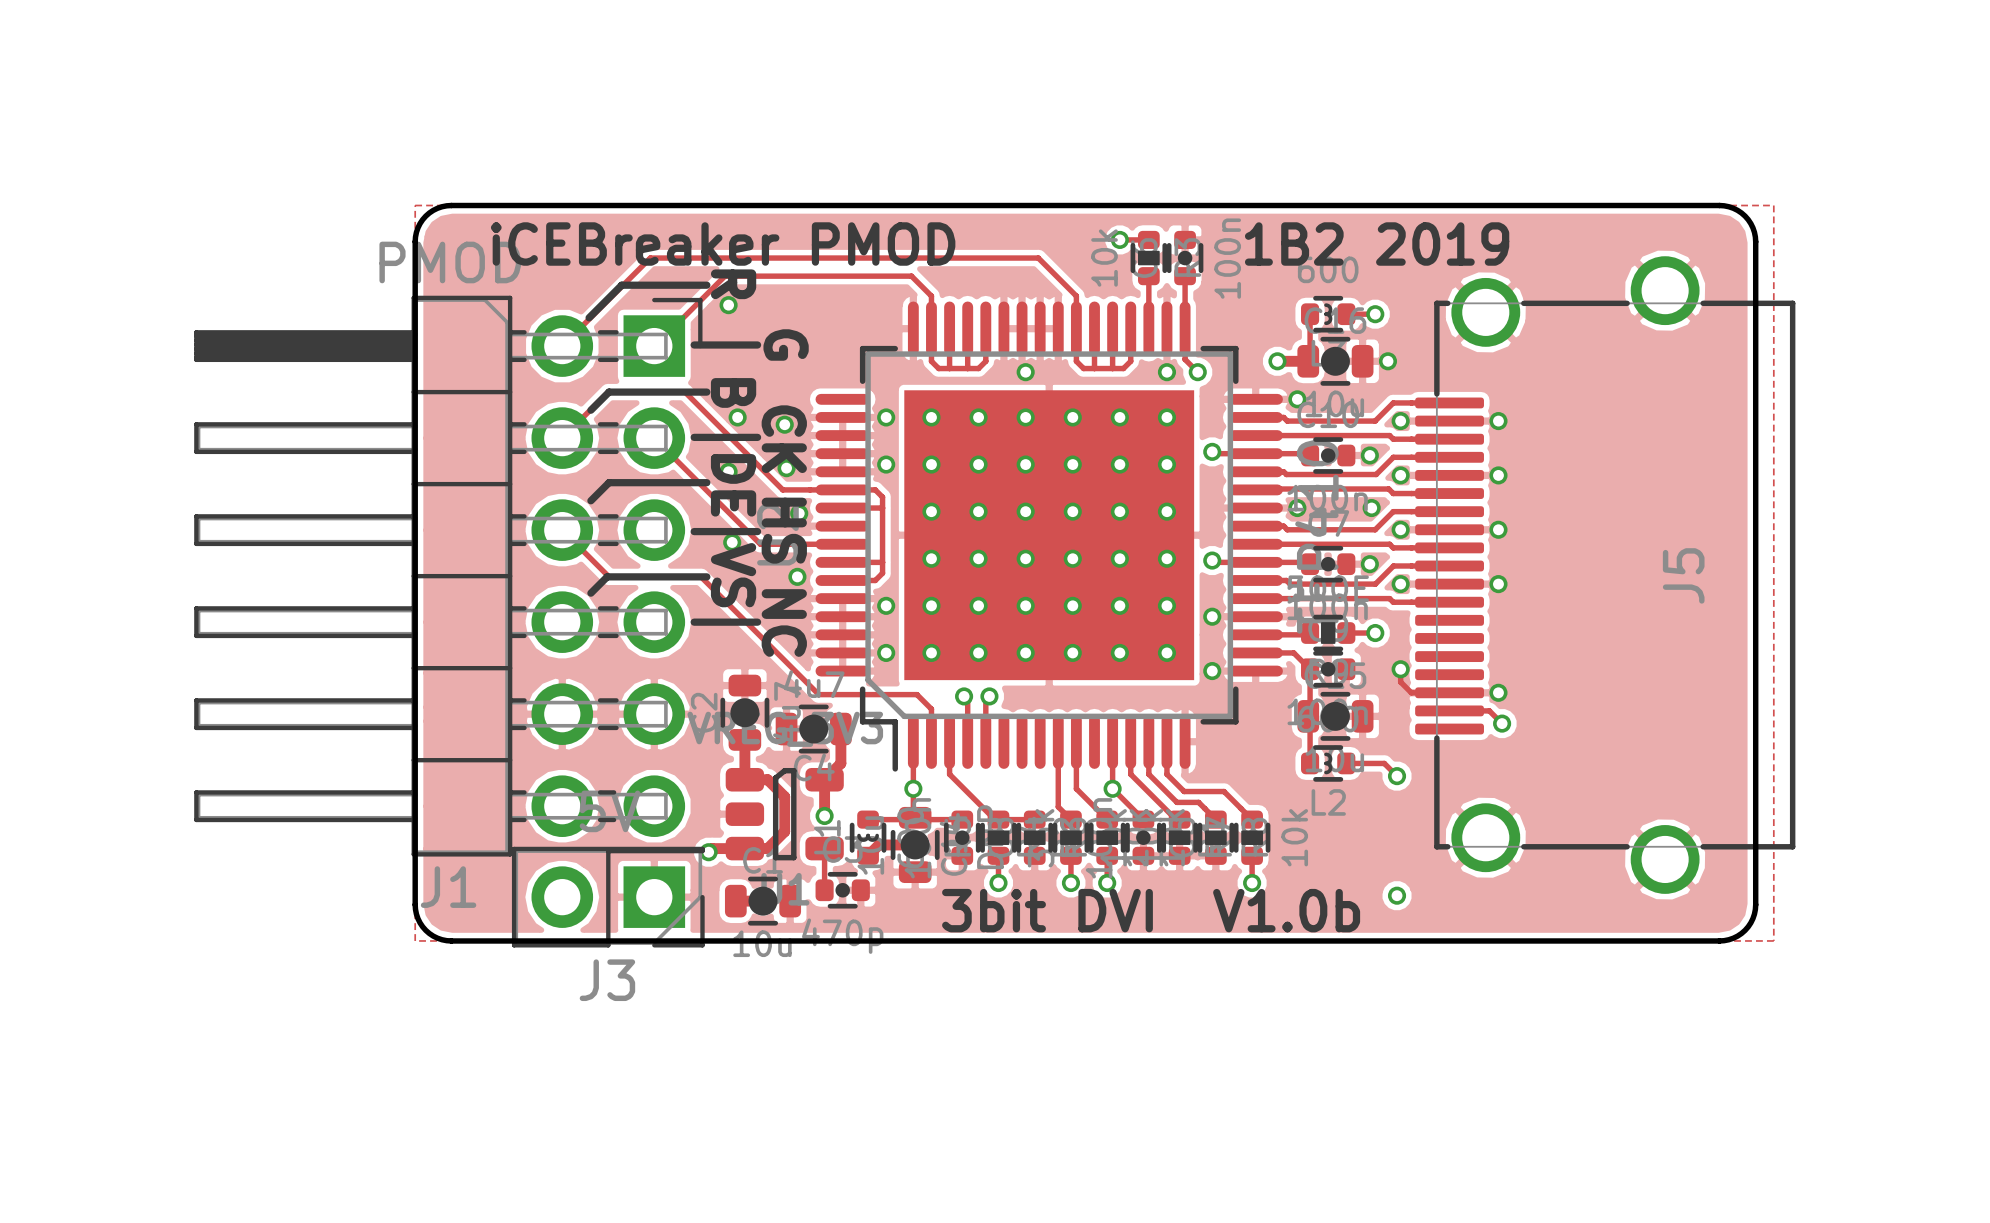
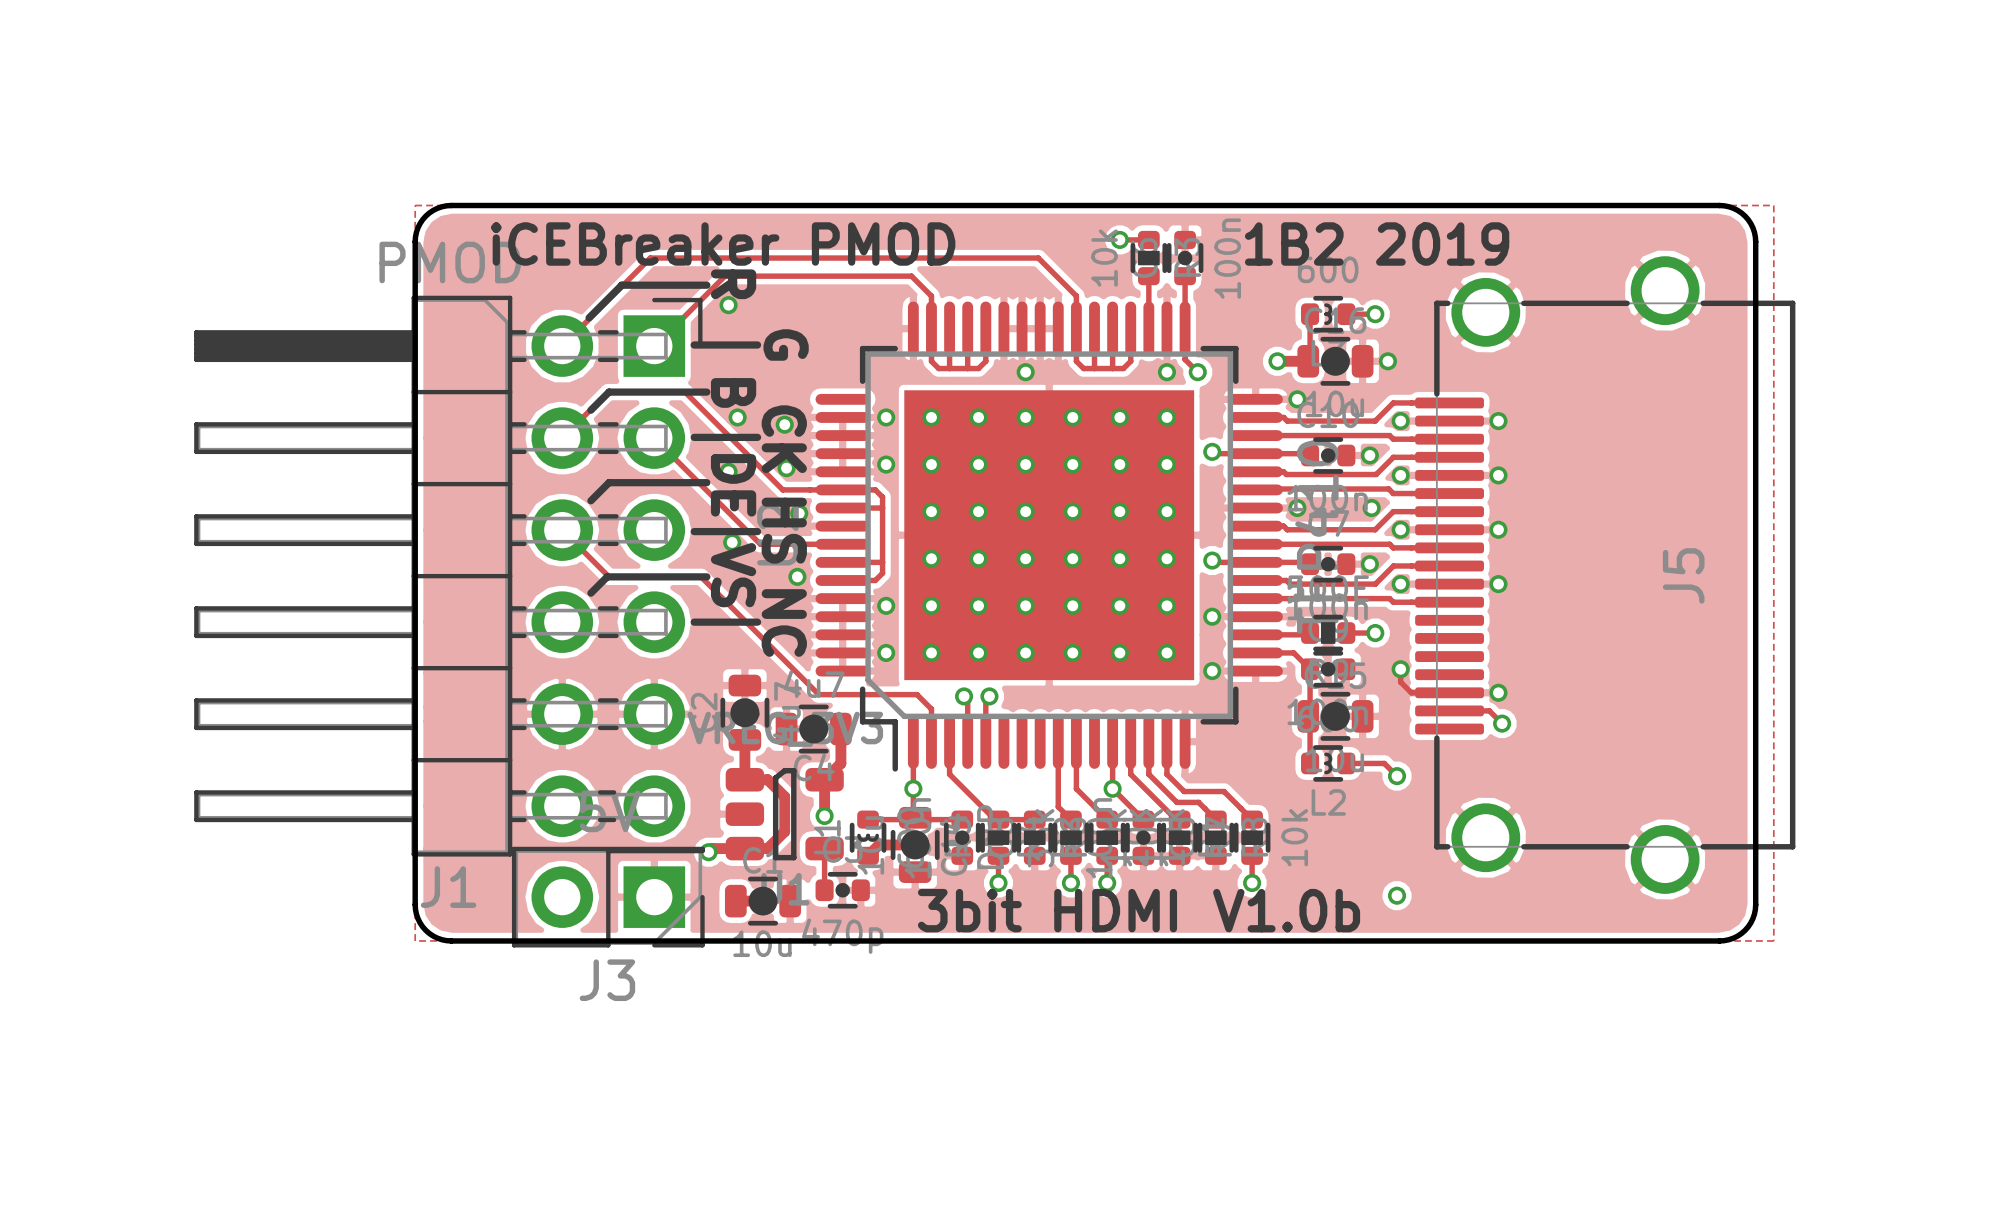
text: 3bit DVI (1047, 910) -> 3bit HDMI (1047, 910)

